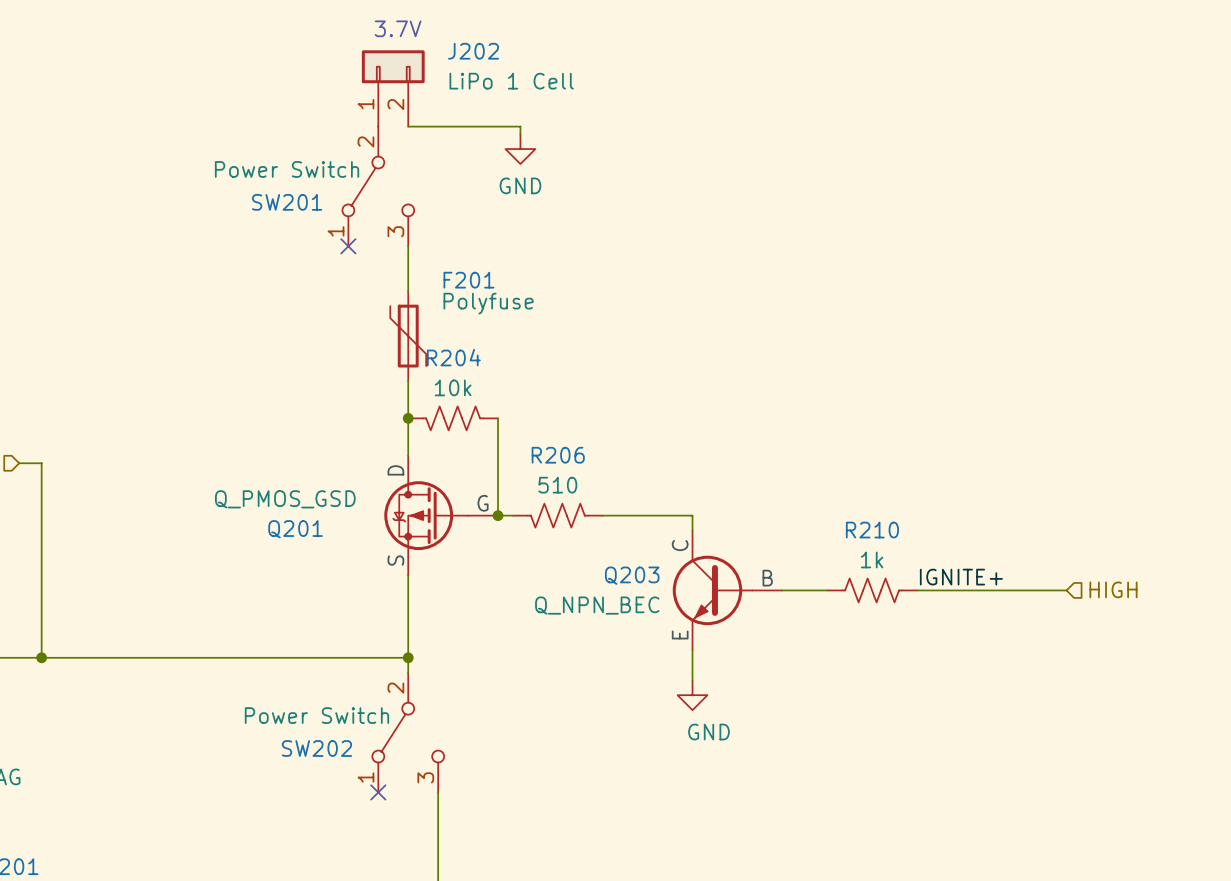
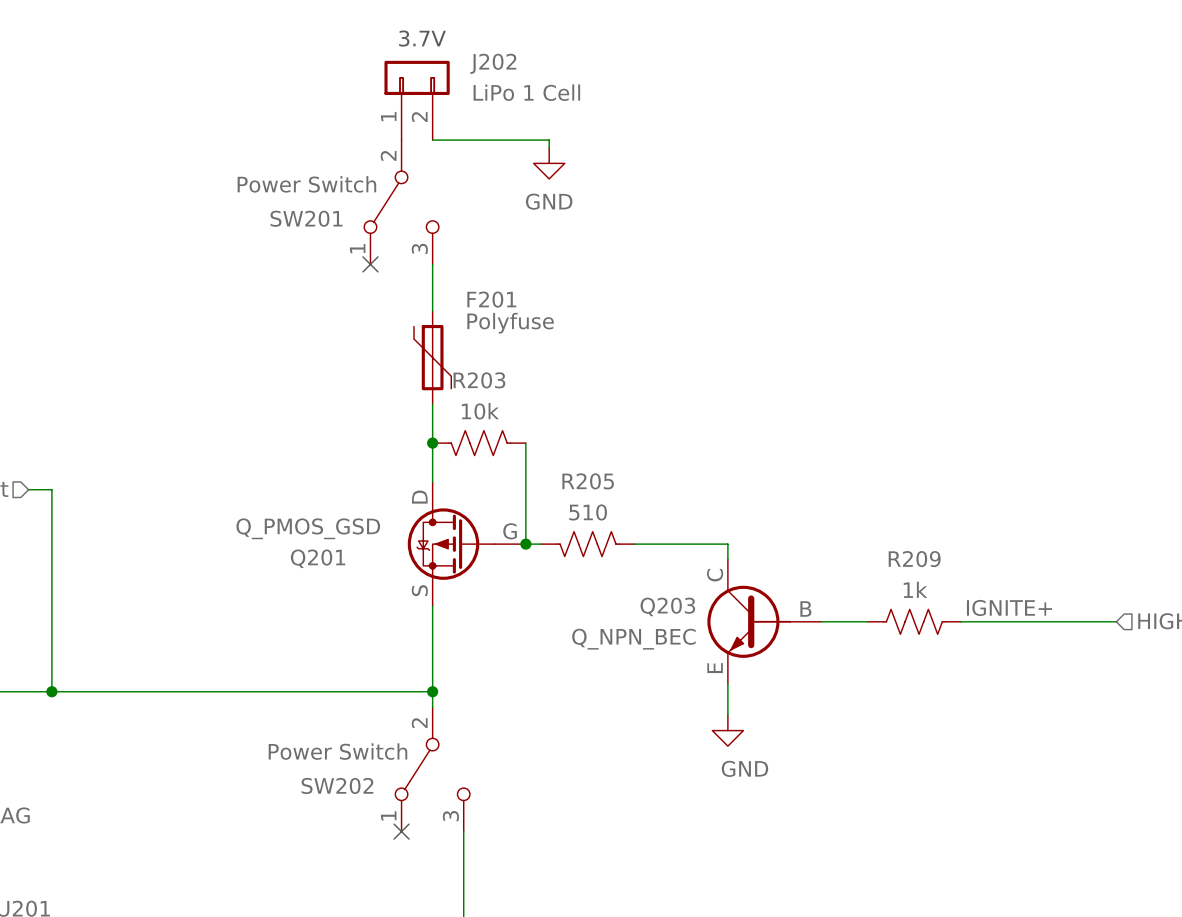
R204 name: R204 (453, 357) -> R203 (479, 380)
R206 name: R206 (558, 455) -> R205 (588, 481)
R210 name: R210 (872, 530) -> R209 (914, 559)

